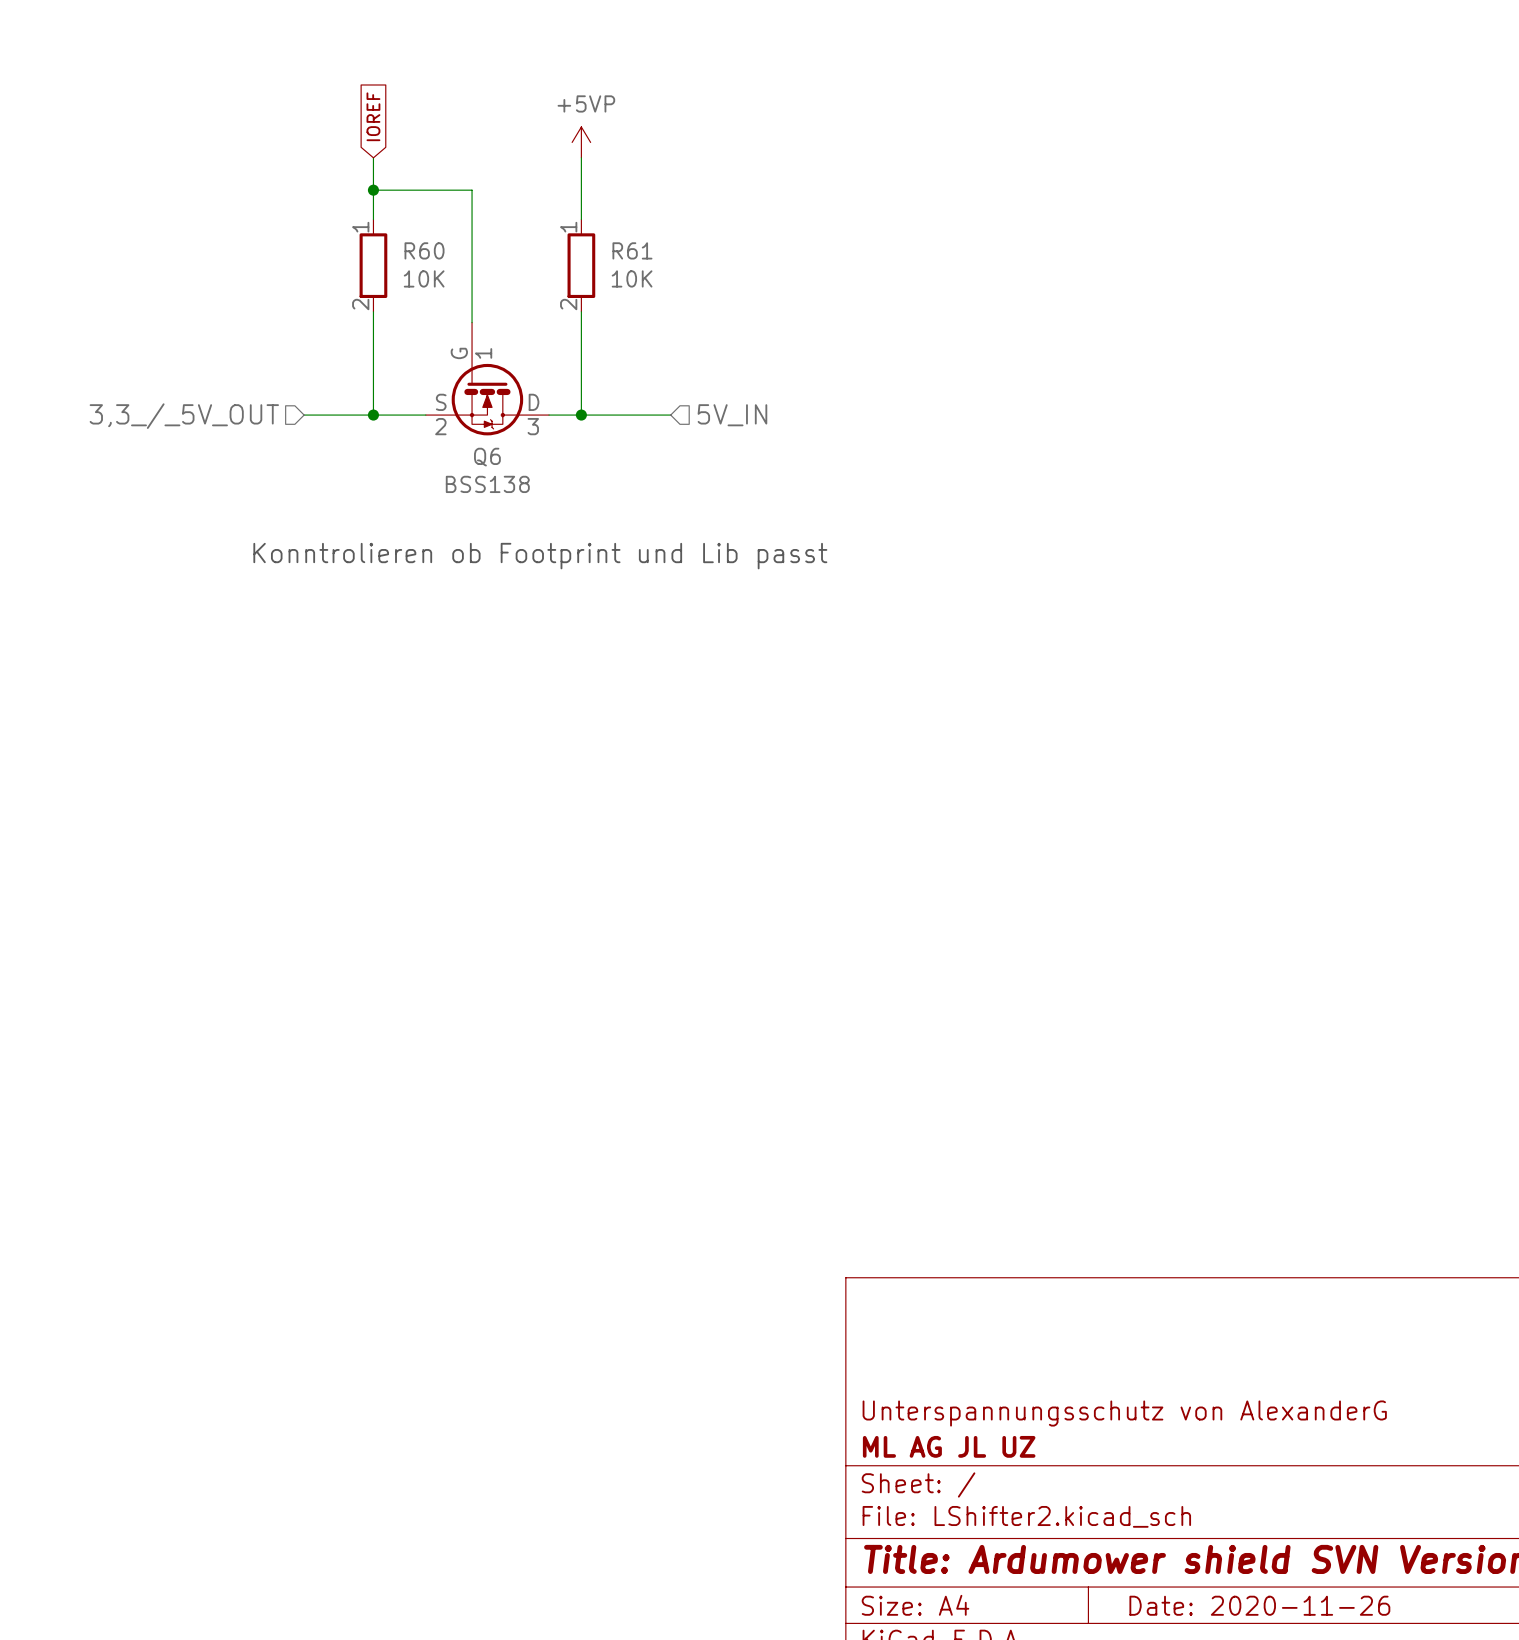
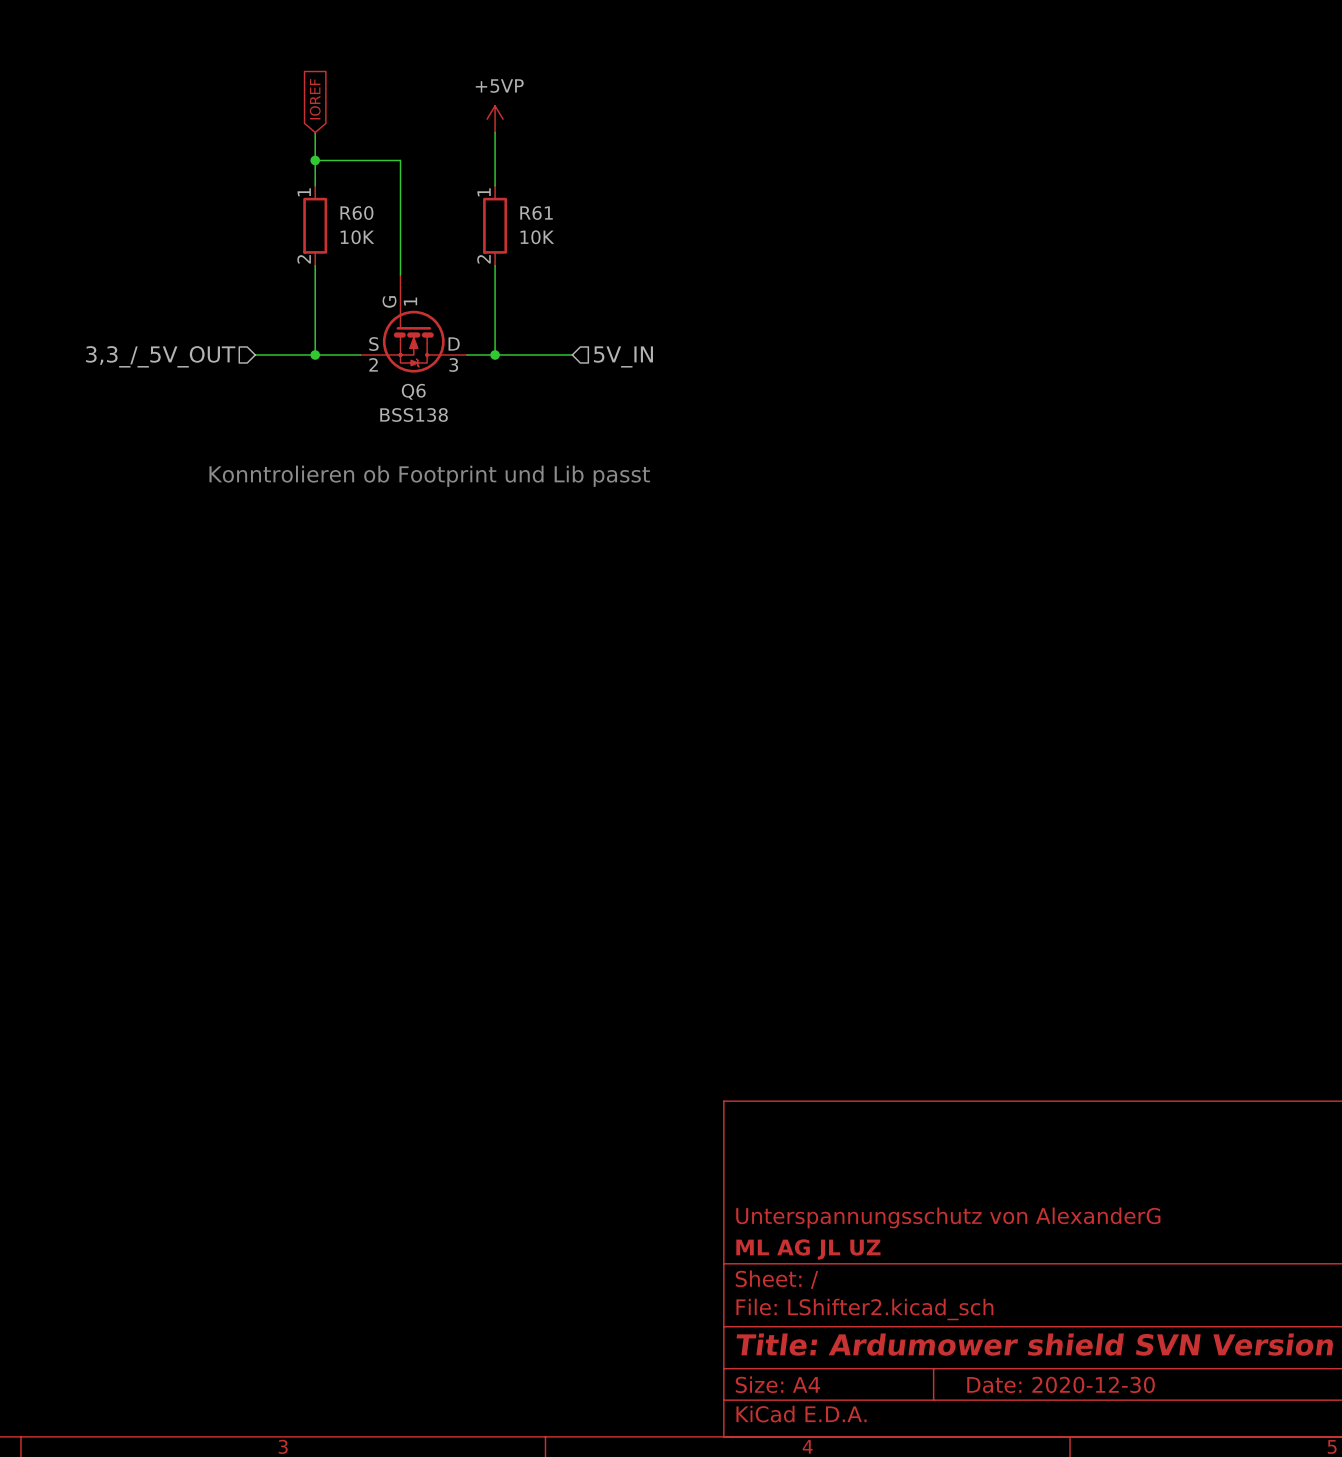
title block: Date: 2020-11-26 (1259, 1605) -> Date: 2020-12-30 (1061, 1384)

